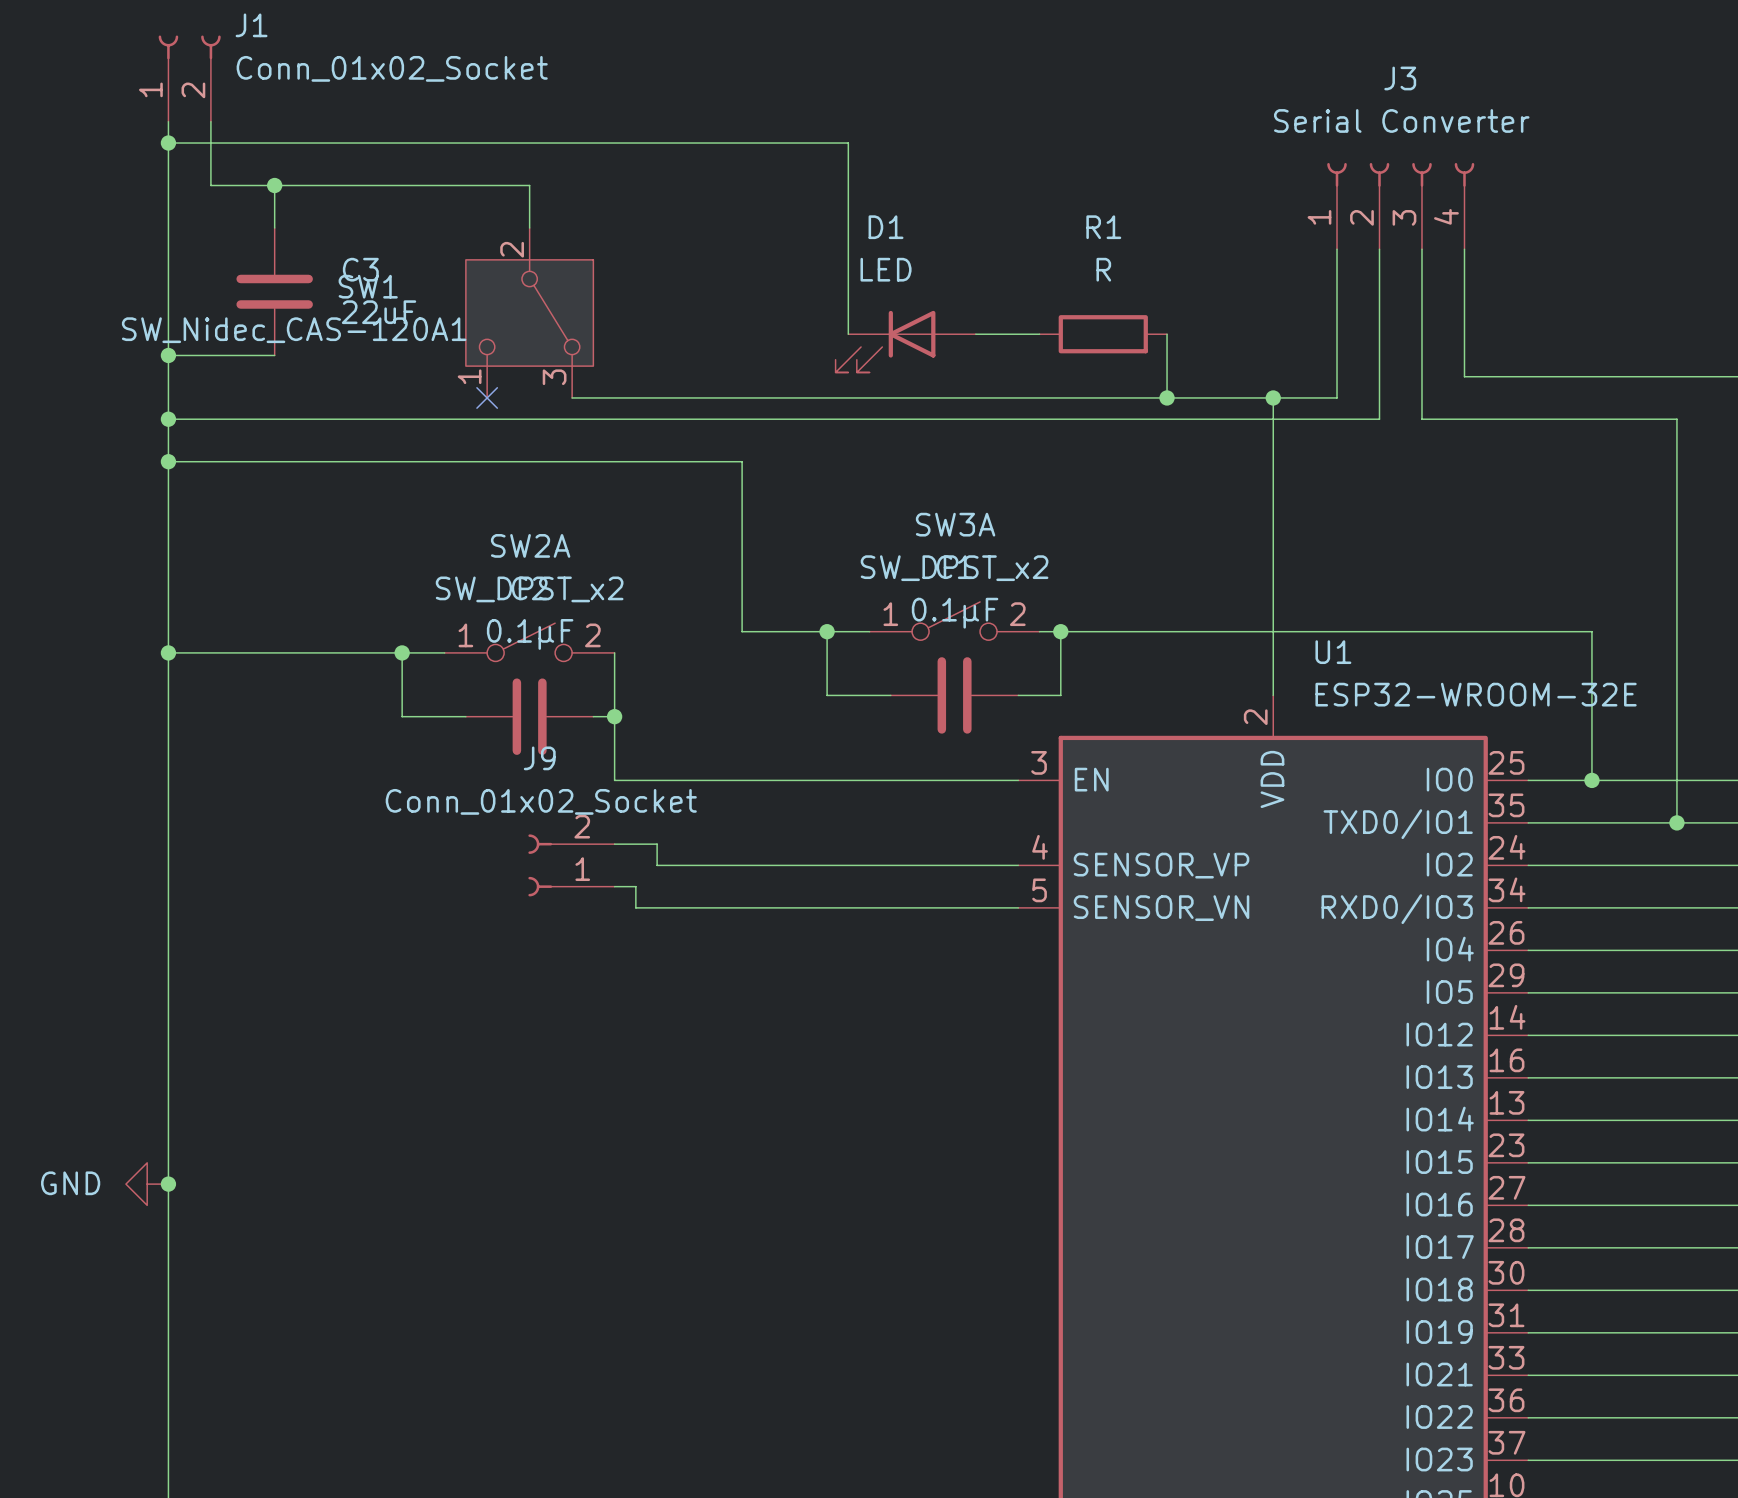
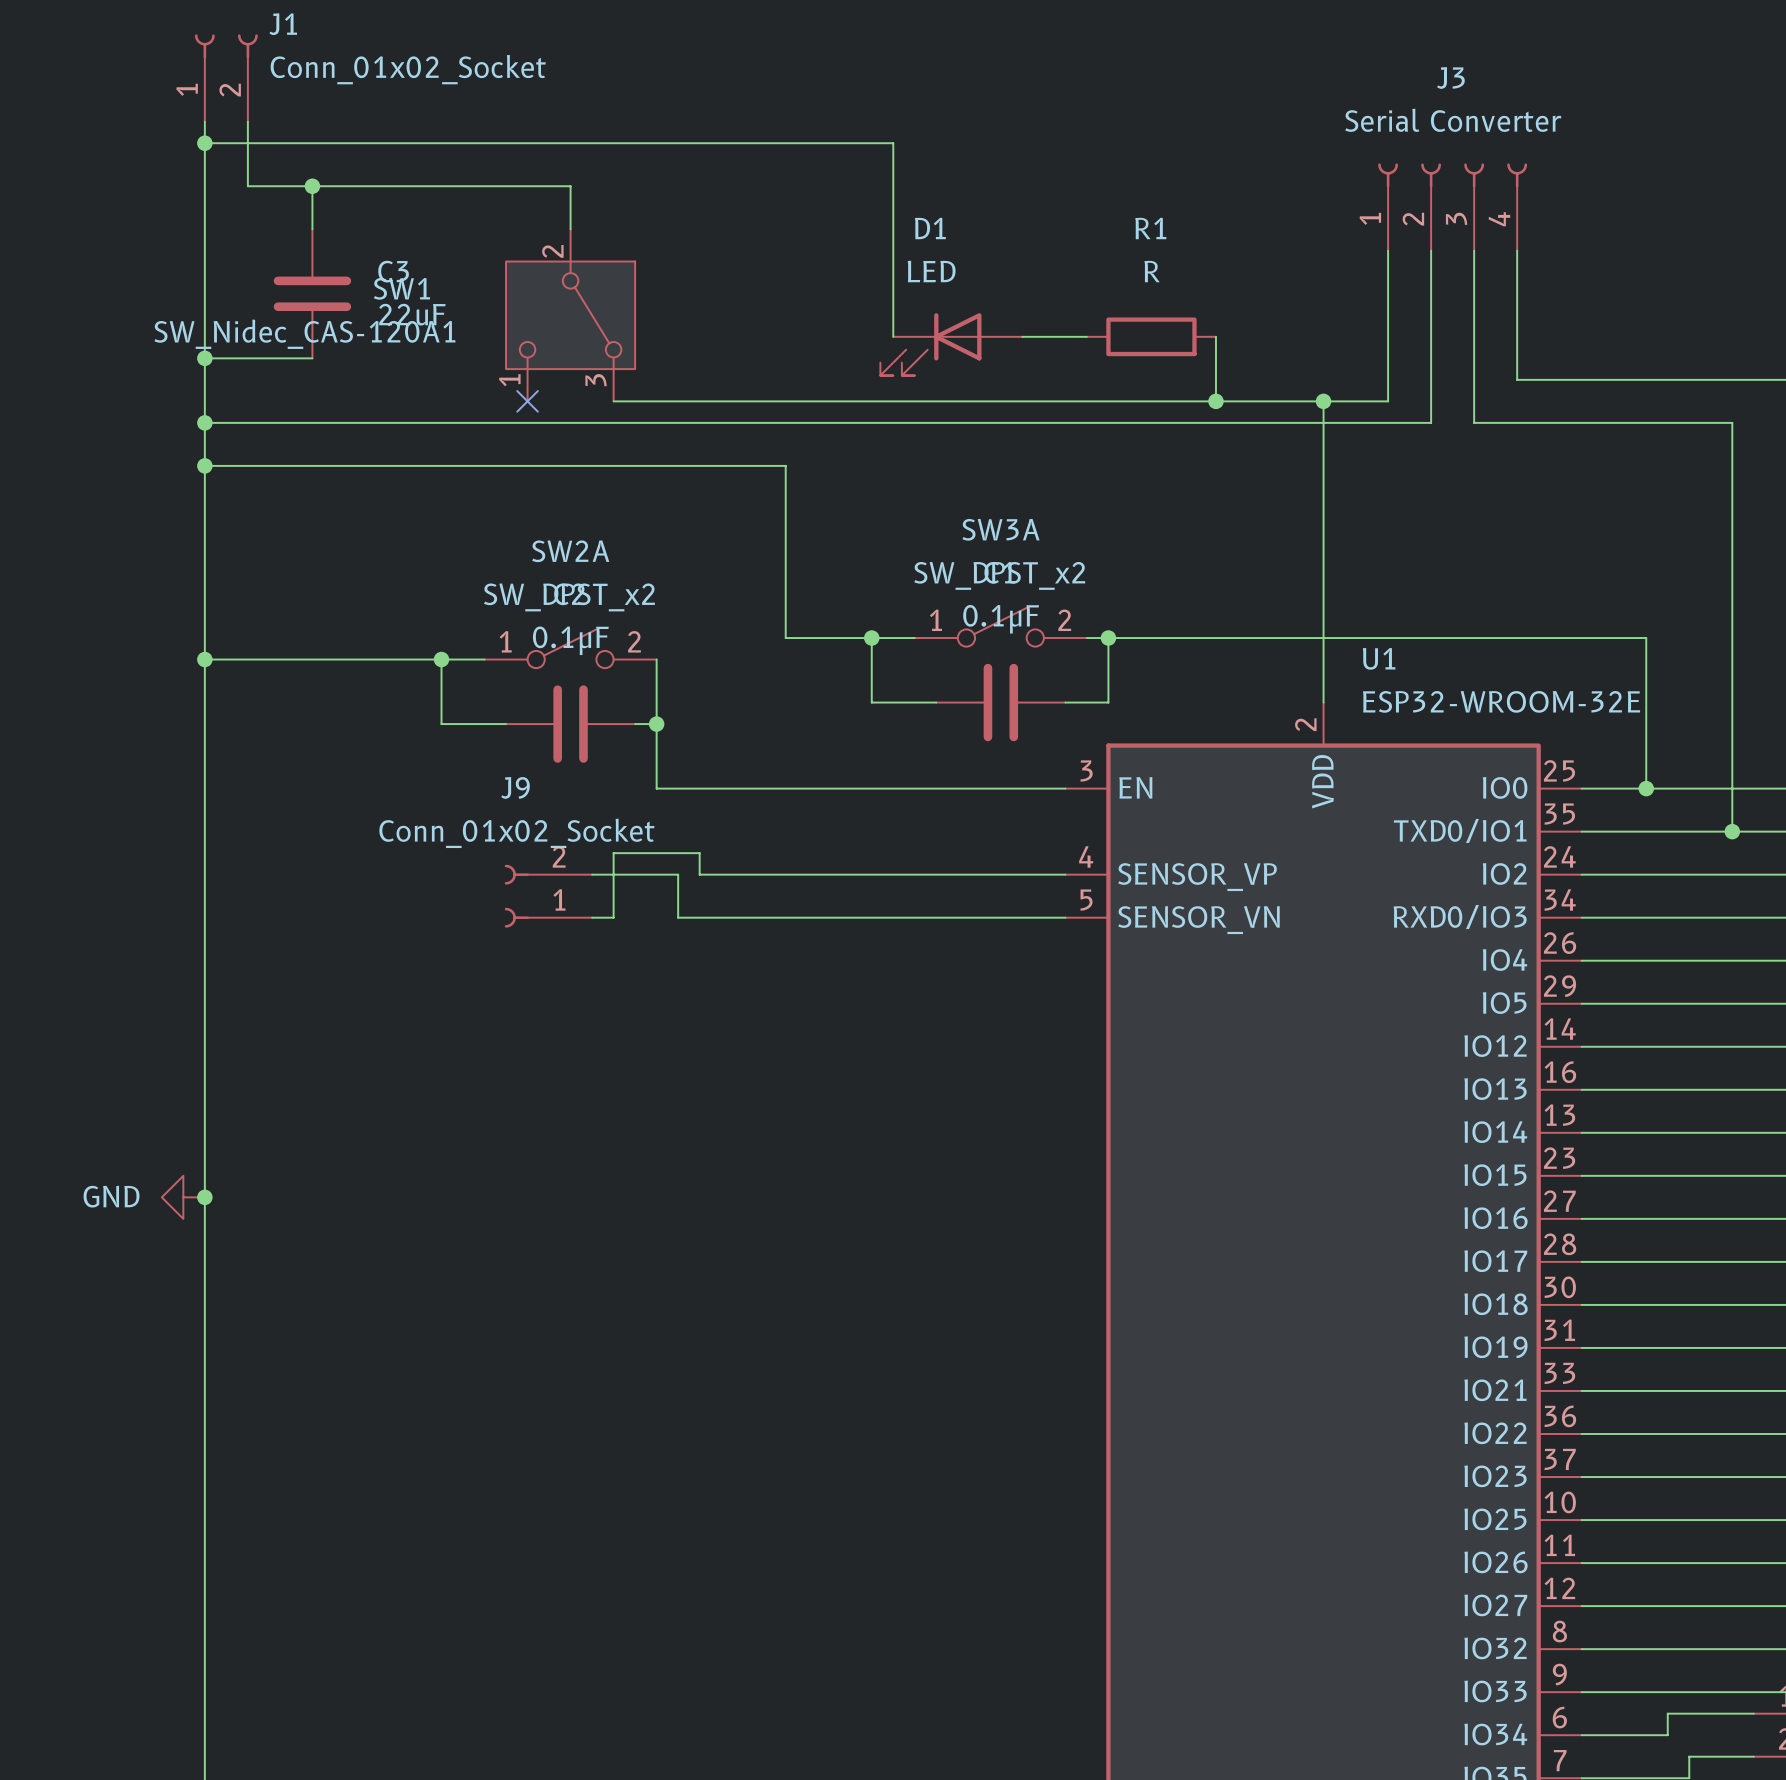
wire: none -> (656, 853) (613, 853) (613, 917) (592, 917)
J9 position: (571, 865) -> (548, 896)
wire: (614, 886) (635, 886) -> (592, 874) (678, 874) (678, 896)

